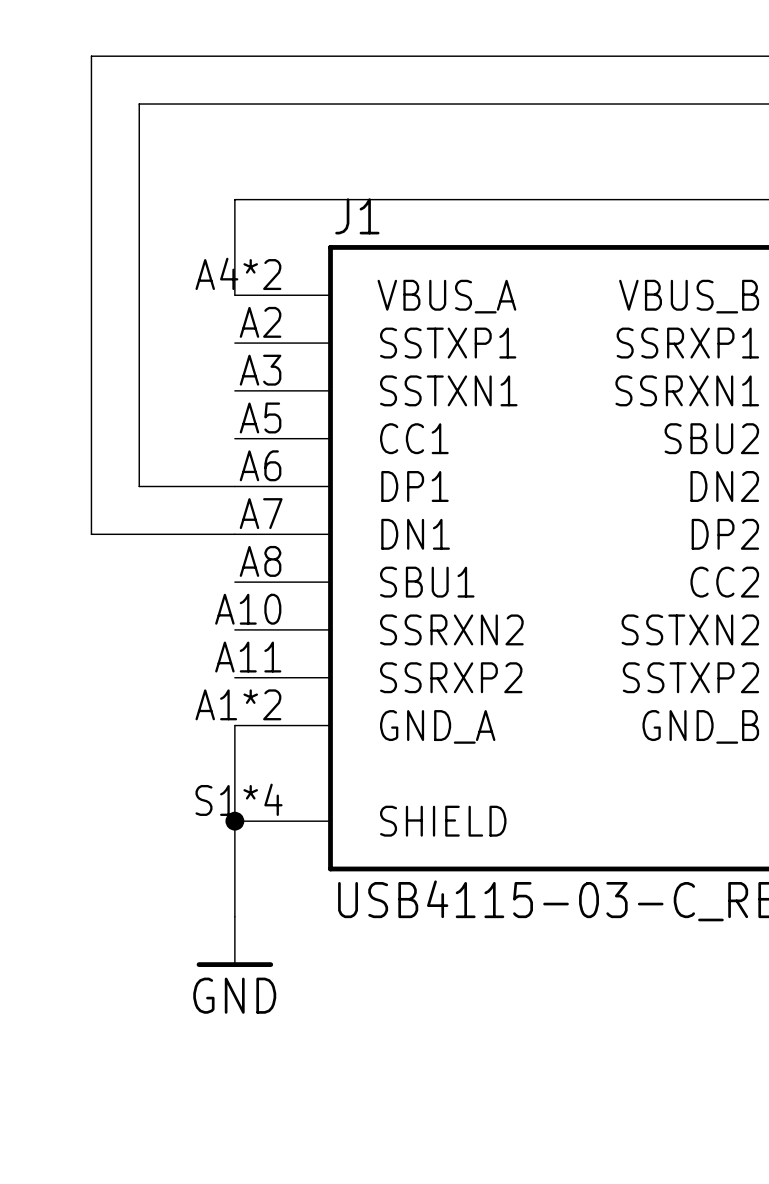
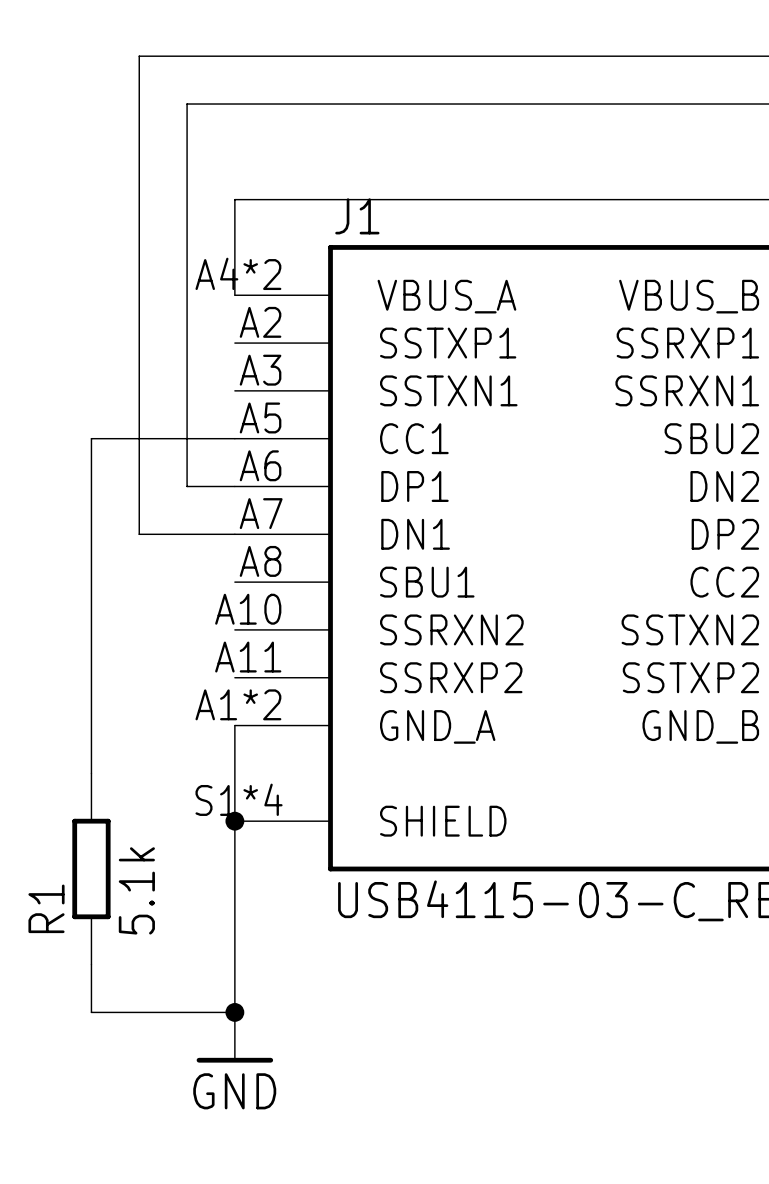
wire: (139, 56) (91, 56) (91, 438) -> (234, 438) (91, 438)
wire: (139, 104) (187, 104) -> (139, 104) (139, 56)
wire: none -> (187, 104) (187, 486)
wire: (139, 486) (187, 486) -> (139, 486) (139, 534)
wire: (91, 534) (139, 534) -> (91, 534) (91, 773)
R1: none -> 5.1k (91, 868)
wire: none -> (234, 916) (234, 1012) (91, 1012) (91, 964)
power symbol position: GND (234, 941) -> GND (234, 1037)
junction: none -> (234, 1012)

